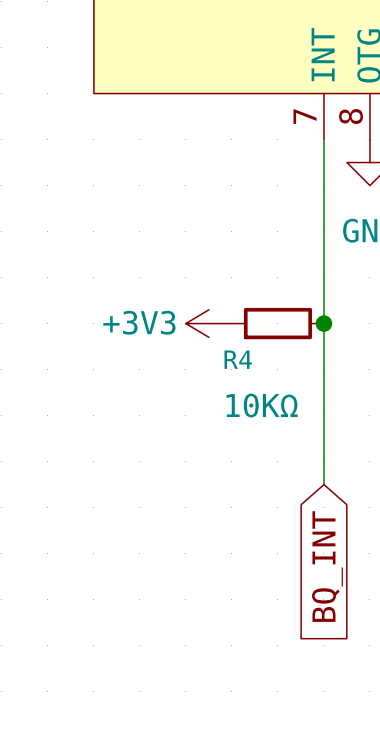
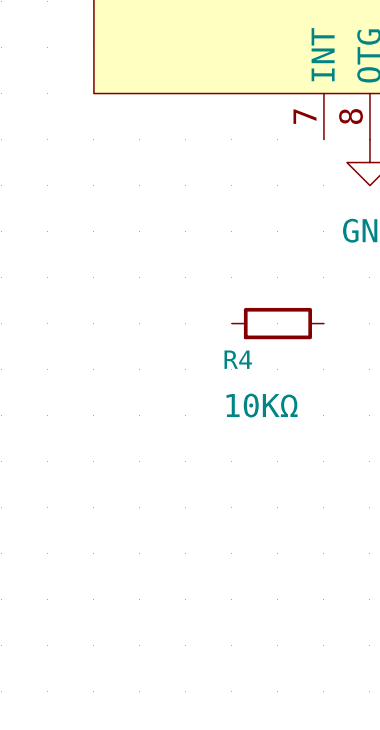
wire: (323, 139) (323, 484) -> none
power symbol: +3V3 (208, 323) -> none
junction: (323, 323) -> none
global label: BQ_INT (327, 566) -> none

